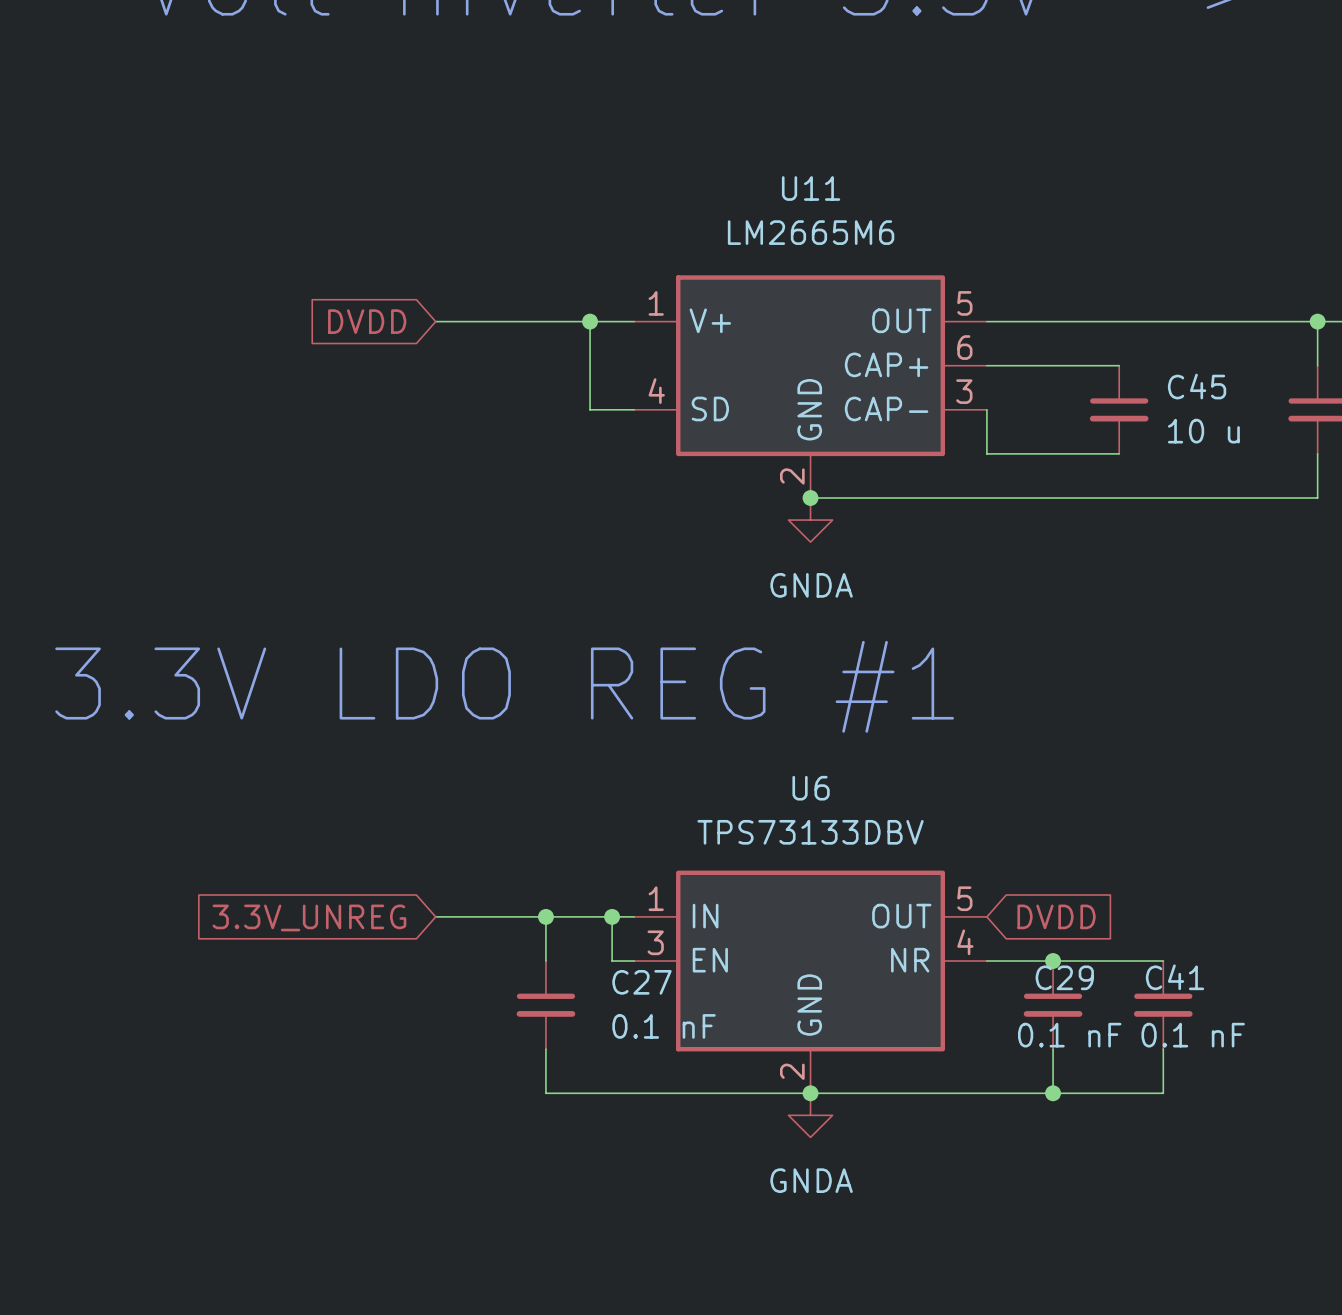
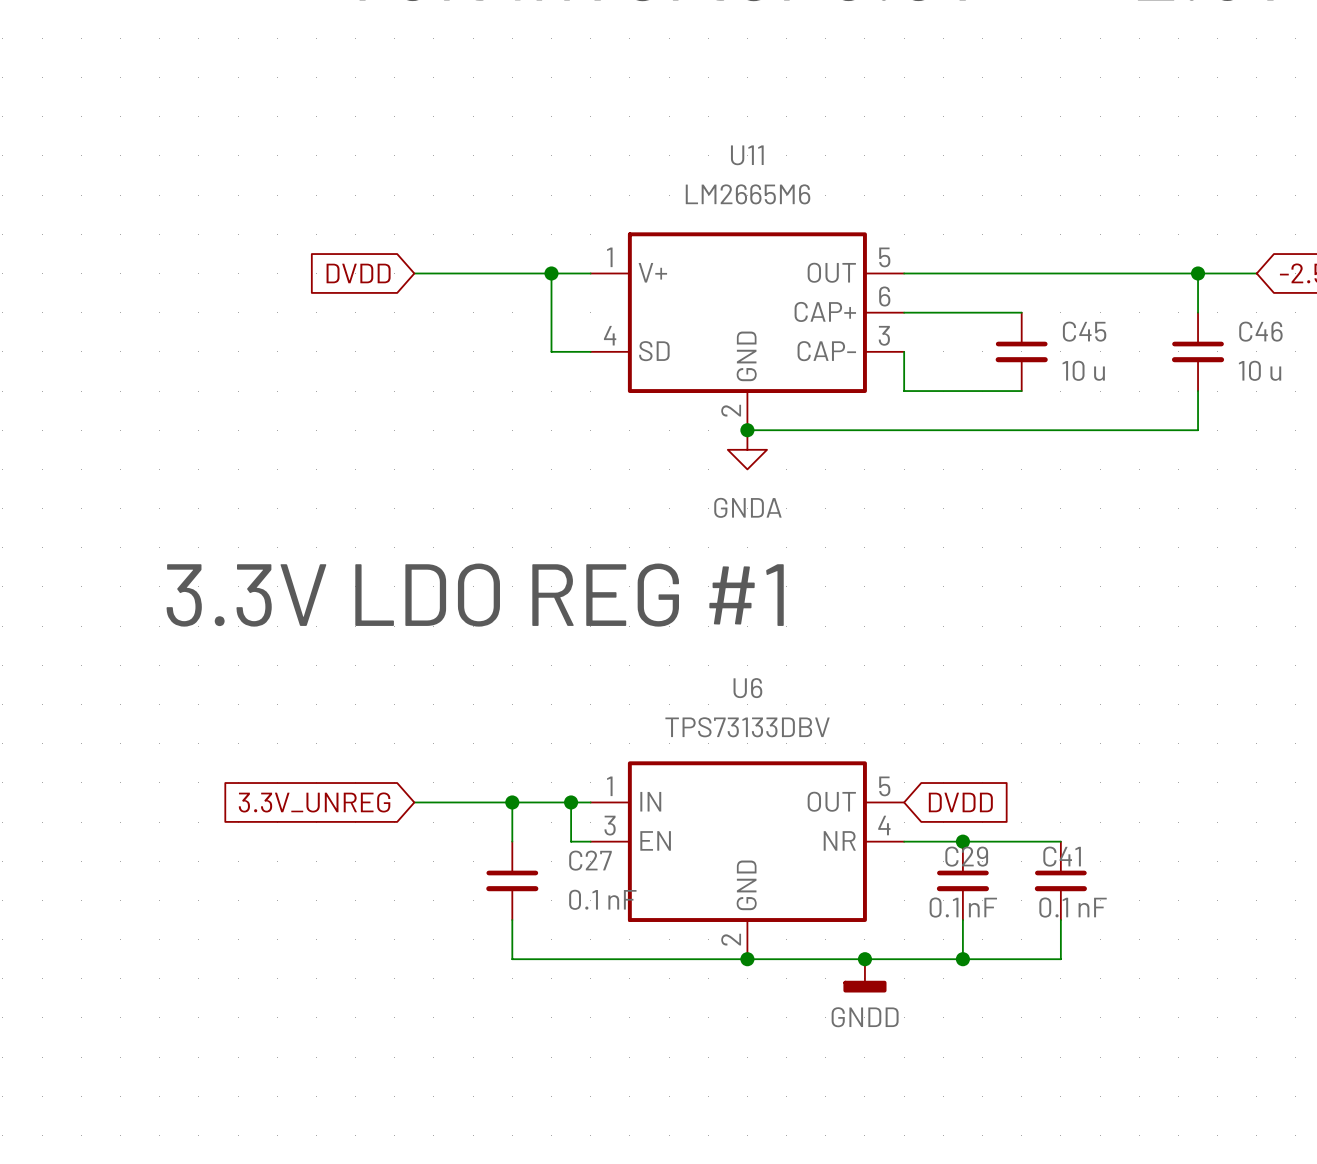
junction: none -> (864, 959)
power symbol: none -> GNDD (864, 975)
power symbol: GNDA (810, 1115) -> none

